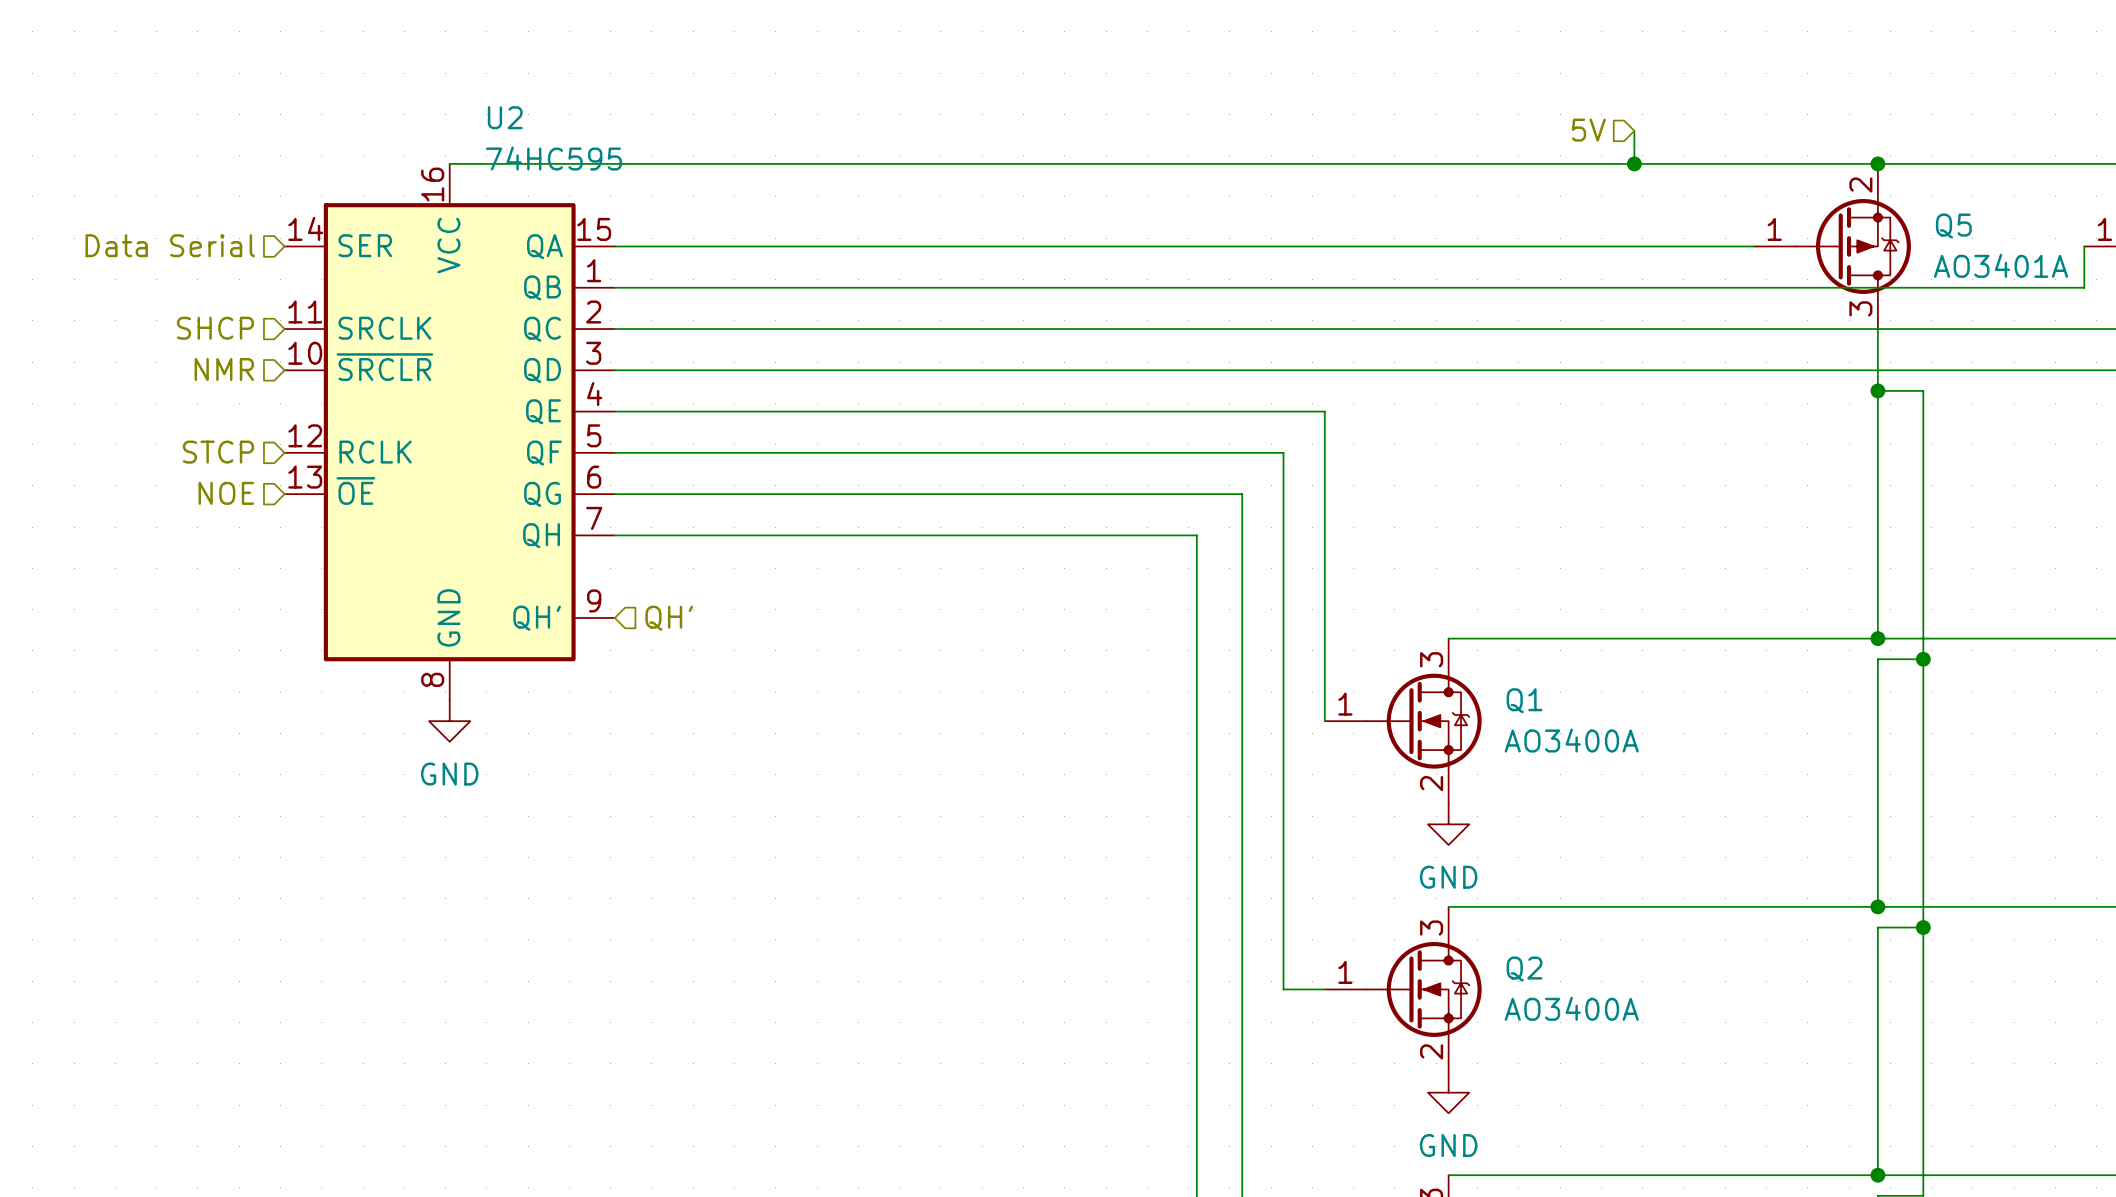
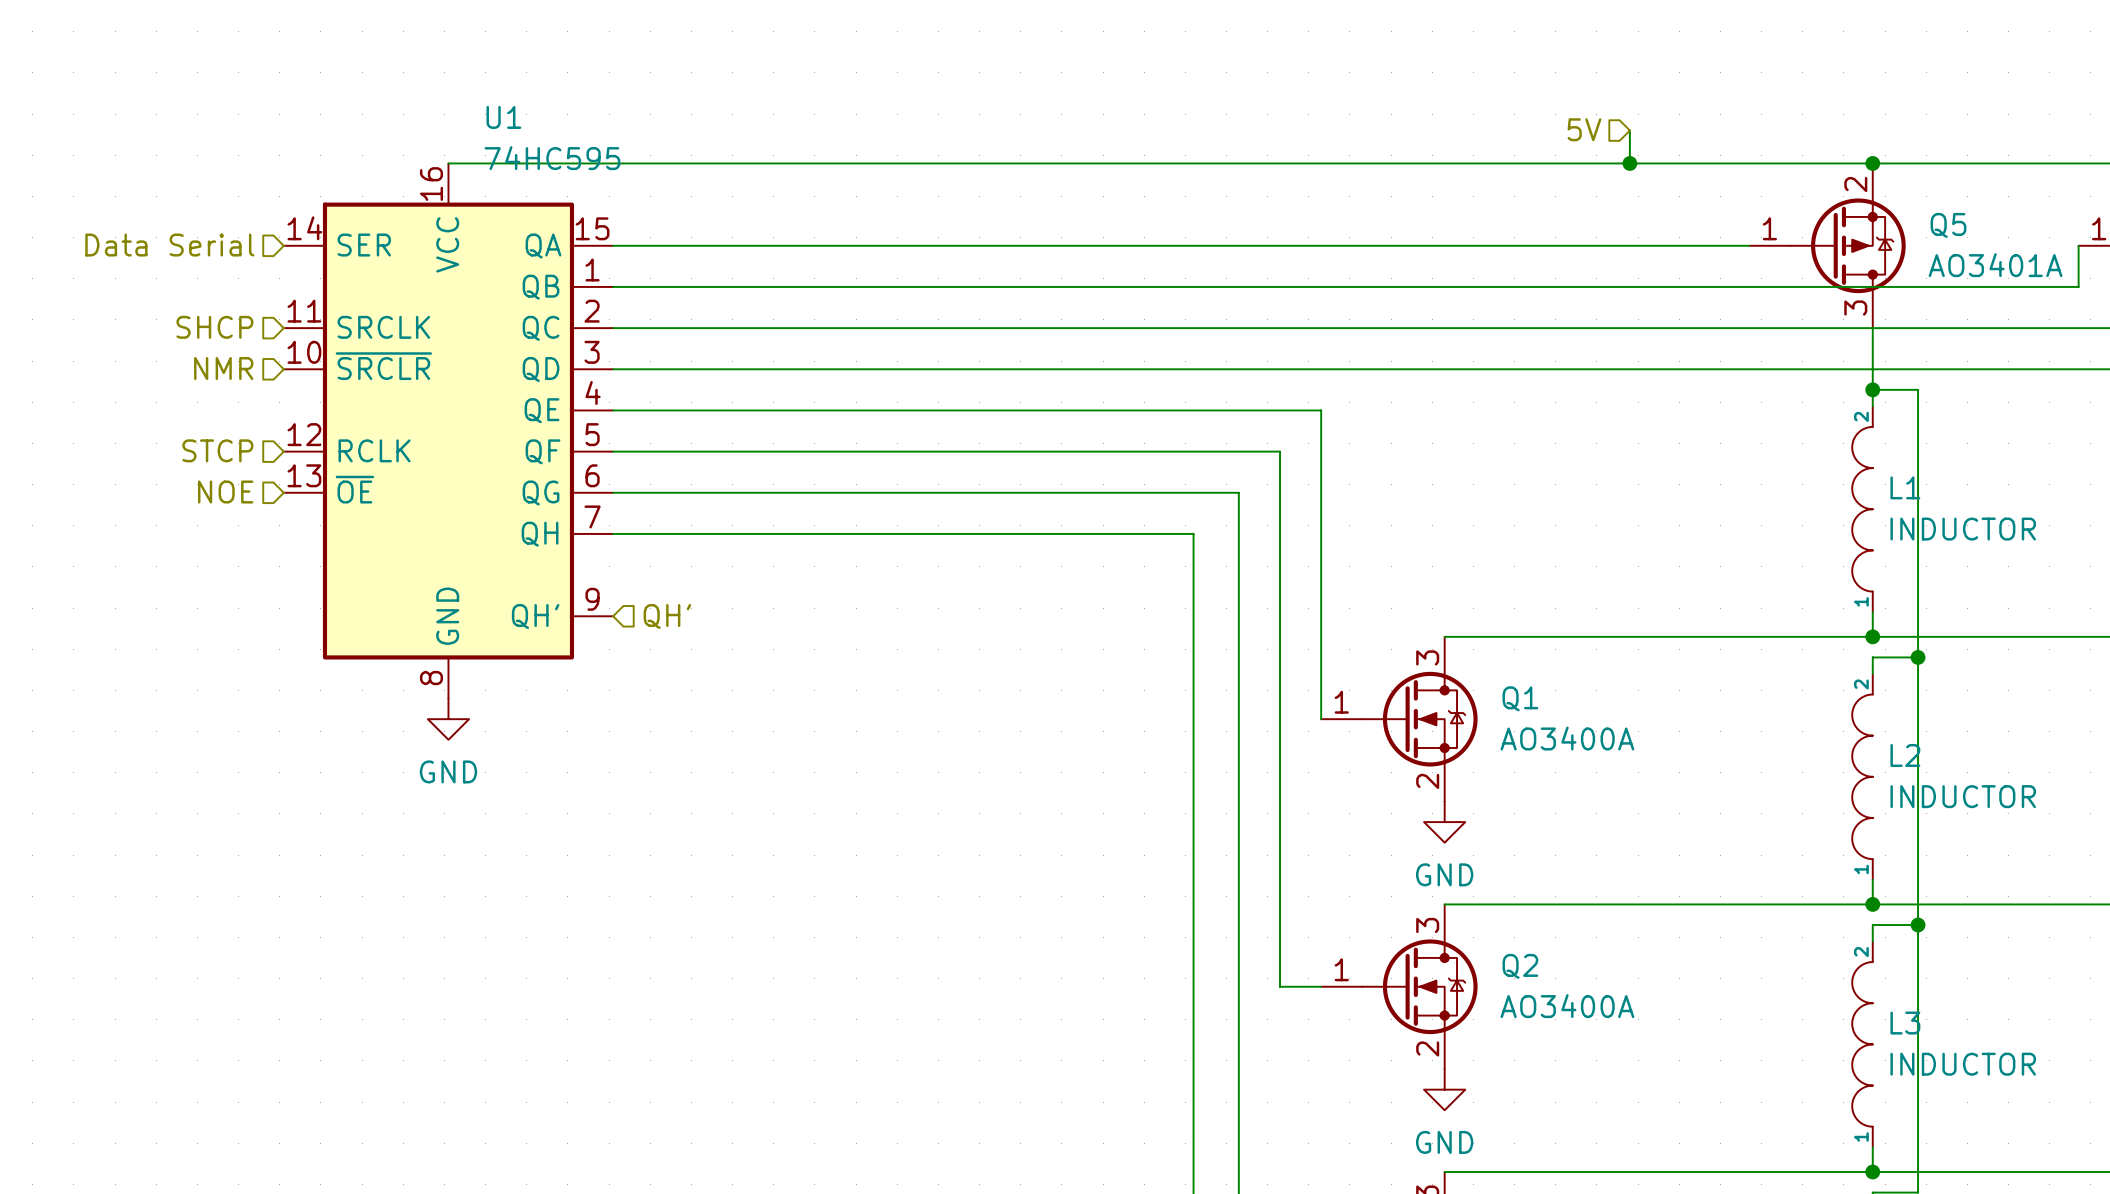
U2 name: U2 (505, 117) -> U1 (503, 117)
wire: (1877, 407) (1877, 613) -> none
L1: none -> INDUCTOR (1862, 509)
wire: (1877, 675) (1877, 882) -> none
L2: none -> INDUCTOR (1862, 776)
wire: (1877, 944) (1877, 1150) -> none
L3: none -> INDUCTOR (1862, 1044)

